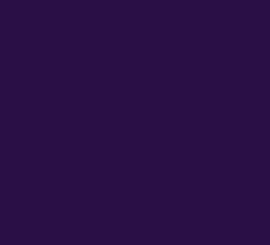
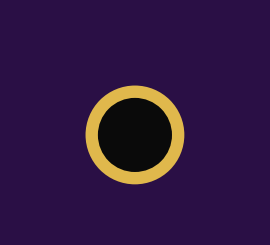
part: none -> (134, 134)

